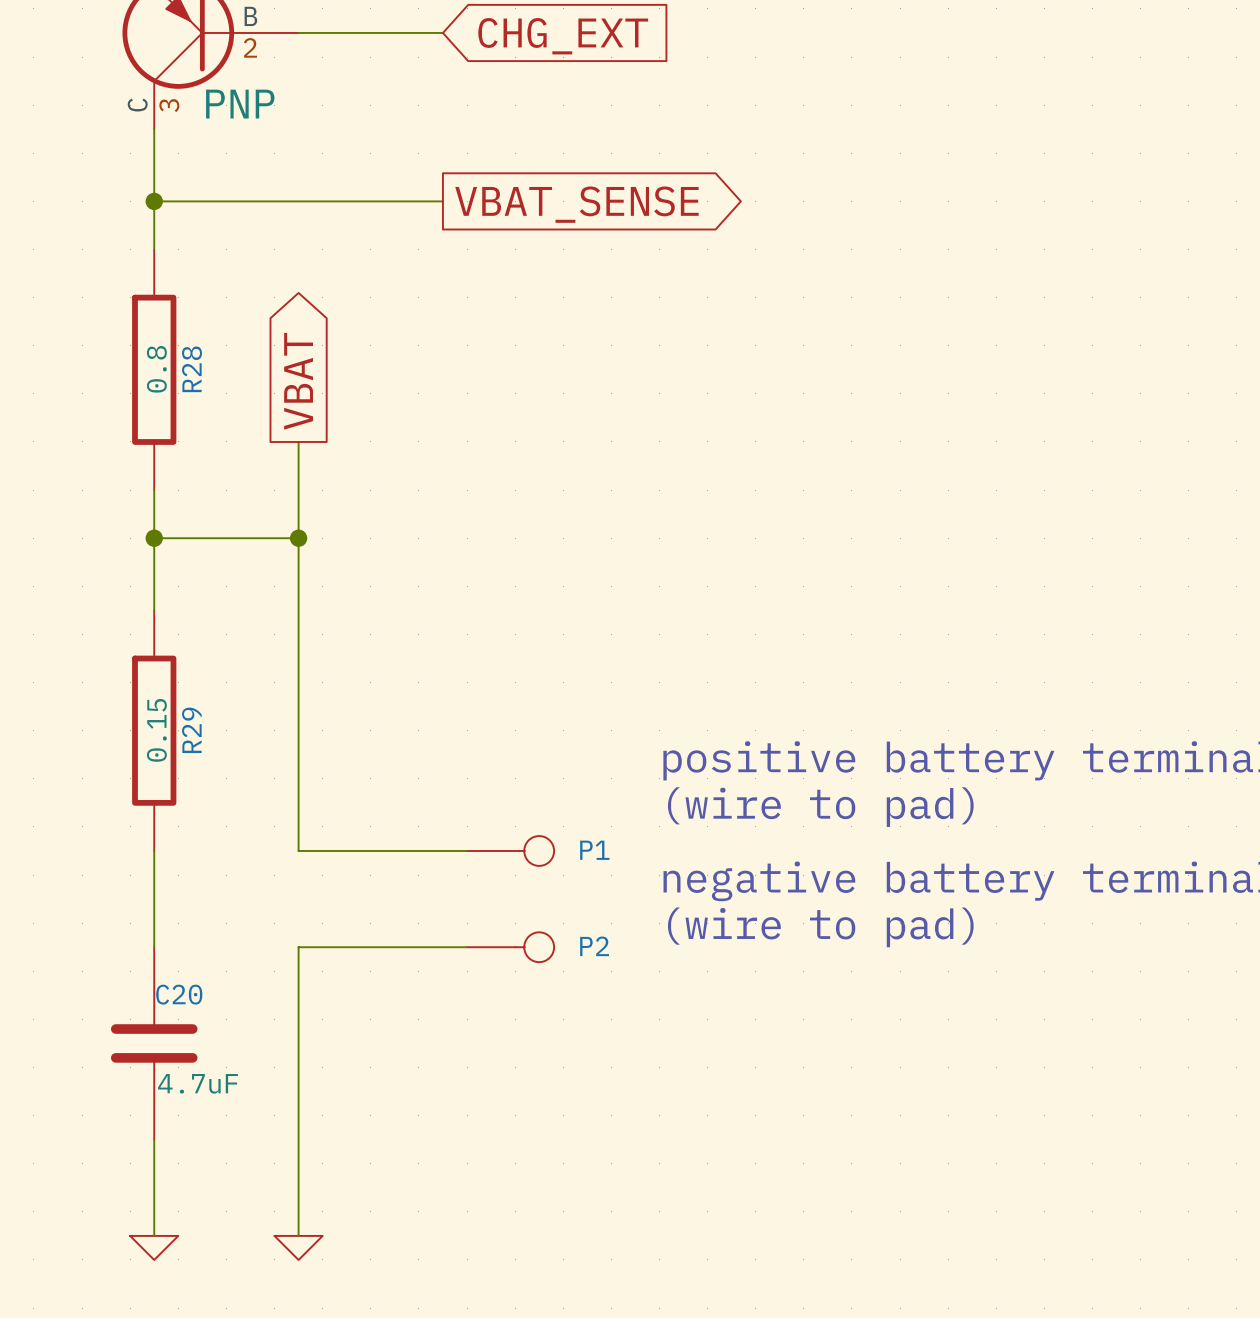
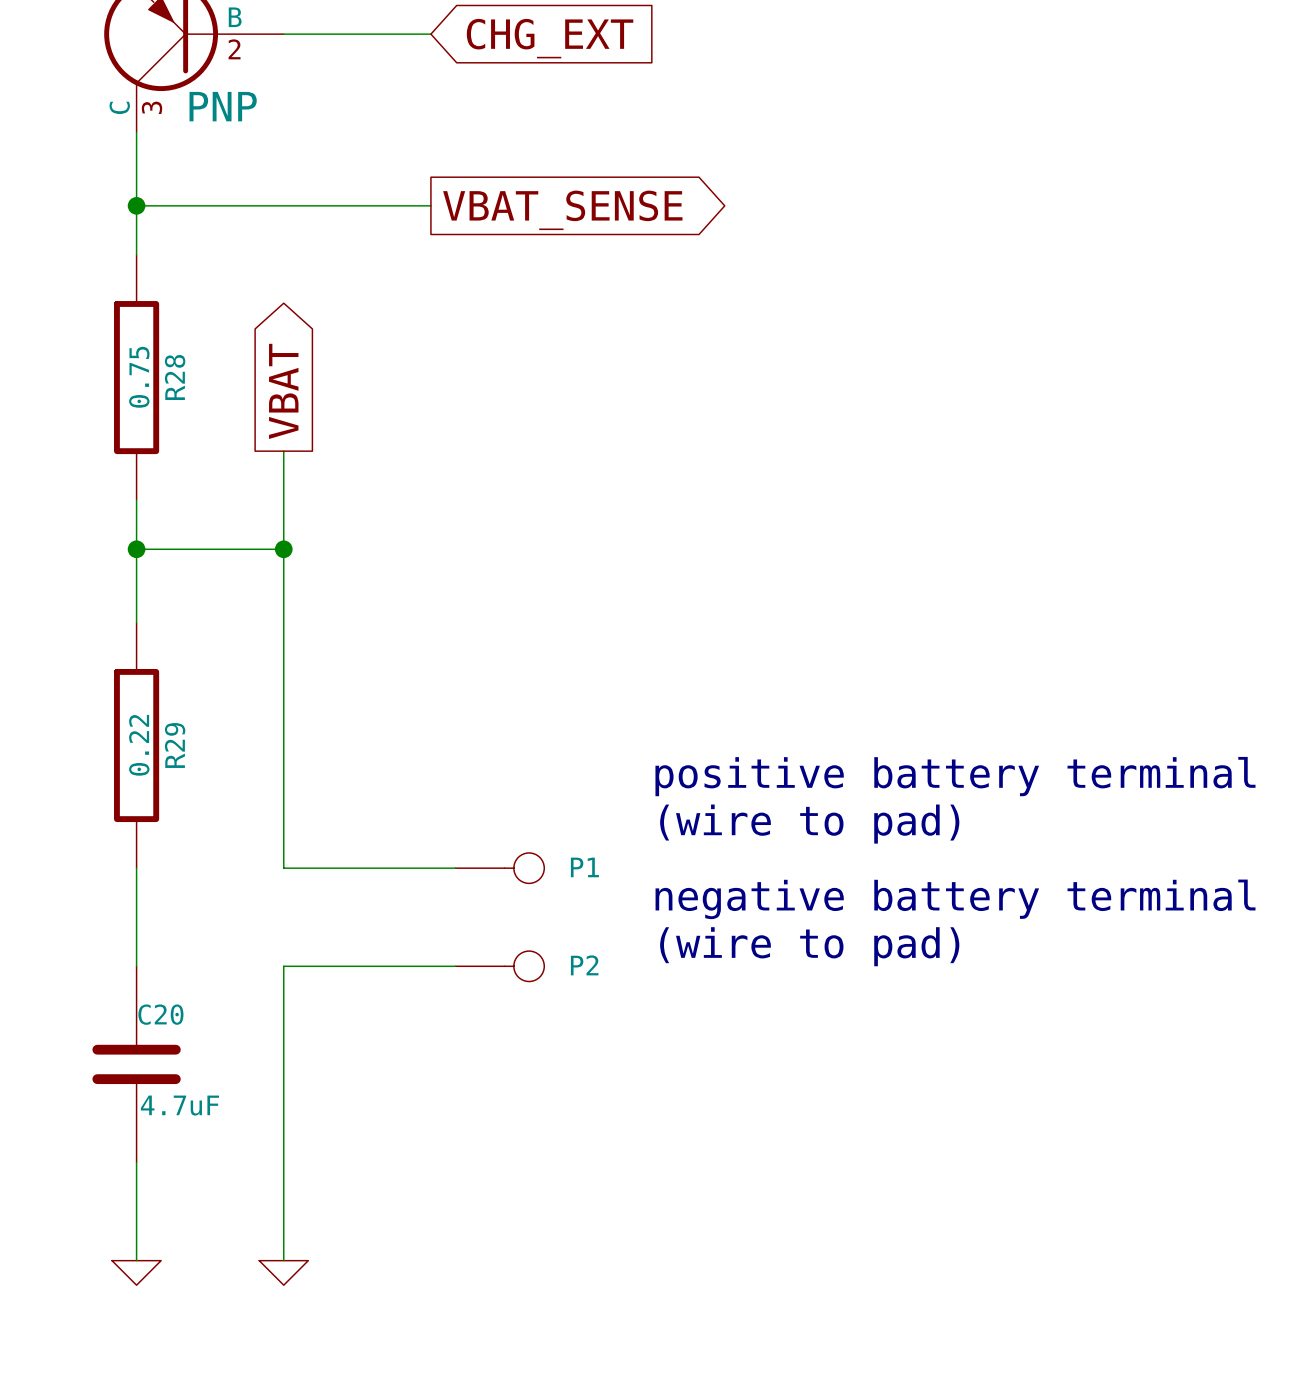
R28 value: 0.8 (156, 369) -> 0.75 (139, 377)
R29 value: 0.15 (156, 730) -> 0.22 (139, 745)

